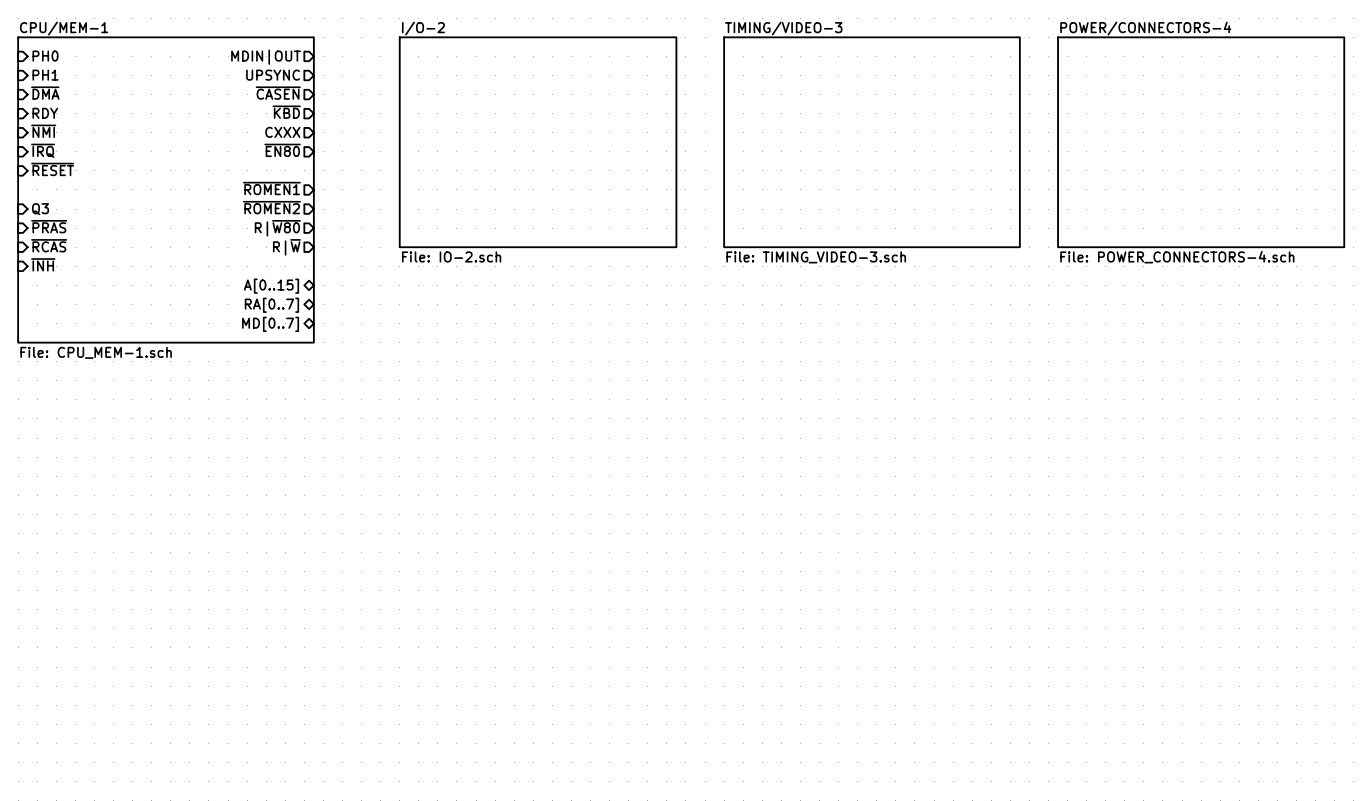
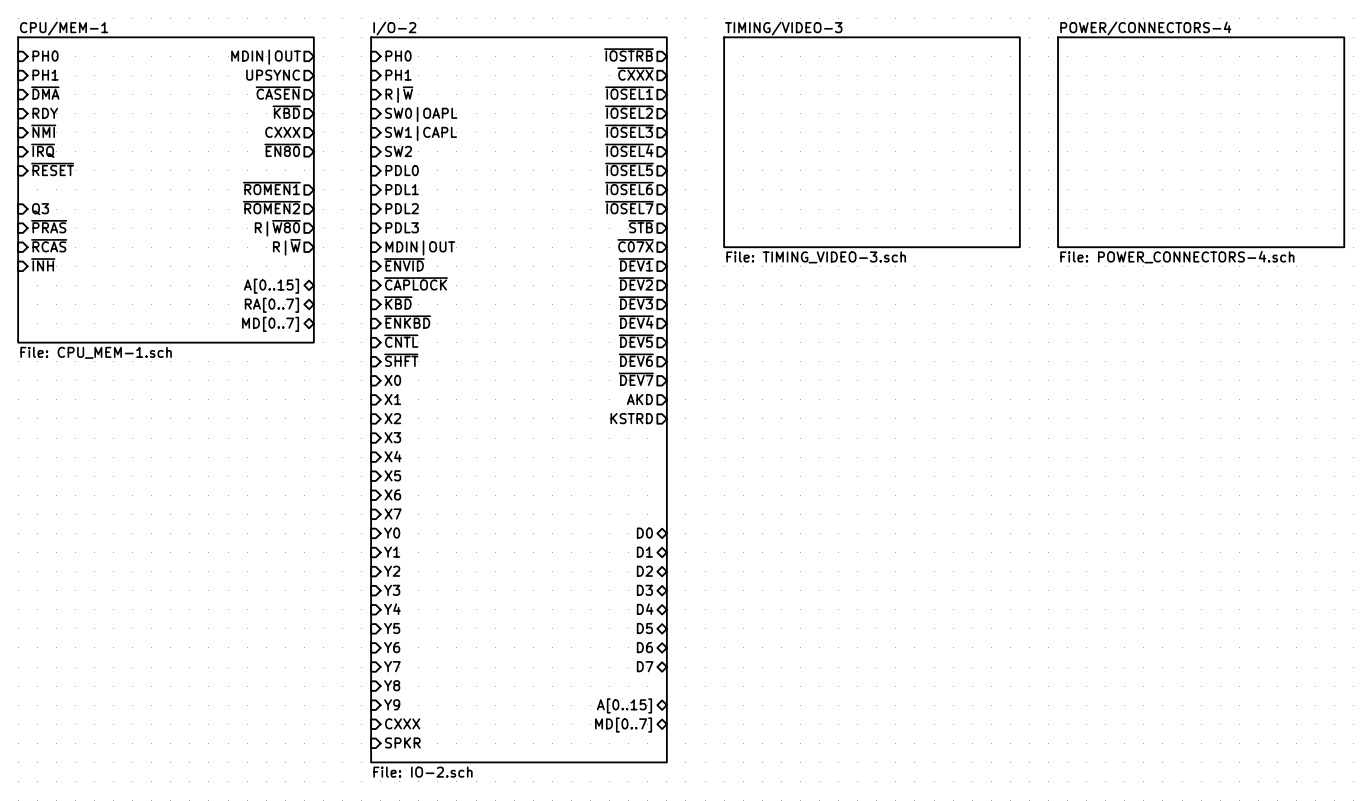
sheet I/O-2 name position: I/O-2 (423, 28) -> I/O-2 (394, 28)
sheet I/O-2 shape: [399, 37, 677, 248] -> [371, 37, 667, 763]
sheet pin: none -> ~{IOSTRB} (629, 54)
sheet pin: none -> PH0 (398, 56)
sheet pin: none -> ~{CXXX} (635, 74)
sheet pin: none -> PH1 (398, 75)
sheet pin: none -> ~{IOSEL1} (629, 93)
sheet pin: none -> R|~{W} (399, 94)
sheet pin: none -> ~{IOSEL2} (629, 112)
sheet pin: none -> SW0|OAPL (421, 114)
sheet pin: none -> ~{IOSEL3} (629, 131)
sheet pin: none -> SW1|CAPL (421, 133)
sheet pin: none -> ~{IOSEL4} (629, 150)
sheet pin: none -> SW2 (398, 151)
sheet pin: none -> ~{IOSEL5} (629, 169)
sheet pin: none -> PDL0 (402, 170)
sheet pin: none -> ~{IOSEL6} (629, 188)
sheet pin: none -> PDL1 (402, 189)
sheet pin: none -> ~{IOSEL7} (629, 207)
sheet pin: none -> PDL2 (402, 208)
sheet pin: none -> ~{STB} (641, 226)
sheet pin: none -> PDL3 (402, 227)
sheet pin: none -> ~{C07X} (635, 245)
sheet pin: none -> MDIN|OUT (420, 248)
sheet I/O-2 value position: File: IO-2.sch (451, 256) -> File: IO-2.sch (422, 772)
sheet pin: none -> ~{ENVID} (404, 264)
sheet pin: none -> ~{DEV1} (636, 264)
sheet pin: none -> ~{CAPLOCK} (416, 283)
sheet pin: none -> ~{DEV2} (636, 283)
sheet pin: none -> ~{KBD} (398, 303)
sheet pin: none -> ~{DEV3} (636, 303)
sheet pin: none -> ~{ENKBD} (407, 322)
sheet pin: none -> ~{DEV4} (636, 322)
sheet pin: none -> ~{CNTL} (401, 341)
sheet pin: none -> ~{DEV5} (636, 341)
sheet pin: none -> ~{SHFT} (401, 360)
sheet pin: none -> ~{DEV6} (636, 360)
sheet pin: none -> ~{DEV7} (636, 379)
sheet pin: none -> X0 (392, 380)
sheet pin: none -> X1 (392, 399)
sheet pin: none -> AKD (639, 399)
sheet pin: none -> X2 (392, 418)
sheet pin: none -> KSTRD (631, 418)
sheet pin: none -> X3 (392, 437)
sheet pin: none -> X4 (393, 456)
sheet pin: none -> X5 (392, 475)
sheet pin: none -> X6 (392, 494)
sheet pin: none -> X7 (393, 514)
sheet pin: none -> Y0 (392, 533)
sheet pin: none -> D0 (644, 533)
sheet pin: none -> Y1 (392, 552)
sheet pin: none -> D1 (644, 552)
sheet pin: none -> Y2 (392, 571)
sheet pin: none -> D2 (644, 571)
sheet pin: none -> Y3 (392, 590)
sheet pin: none -> D3 (644, 590)
sheet pin: none -> Y4 (392, 609)
sheet pin: none -> D4 (645, 609)
sheet pin: none -> Y5 (392, 628)
sheet pin: none -> D5 (644, 628)
sheet pin: none -> Y6 (392, 647)
sheet pin: none -> D6 (644, 647)
sheet pin: none -> Y7 (392, 666)
sheet pin: none -> D7 (645, 666)
sheet pin: none -> Y8 (392, 685)
sheet pin: none -> Y9 (392, 704)
sheet pin: none -> A[0..15] (624, 705)
sheet pin: none -> CXXX (402, 723)
sheet pin: none -> MD[0..7] (623, 725)
sheet pin: none -> SPKR (402, 742)

